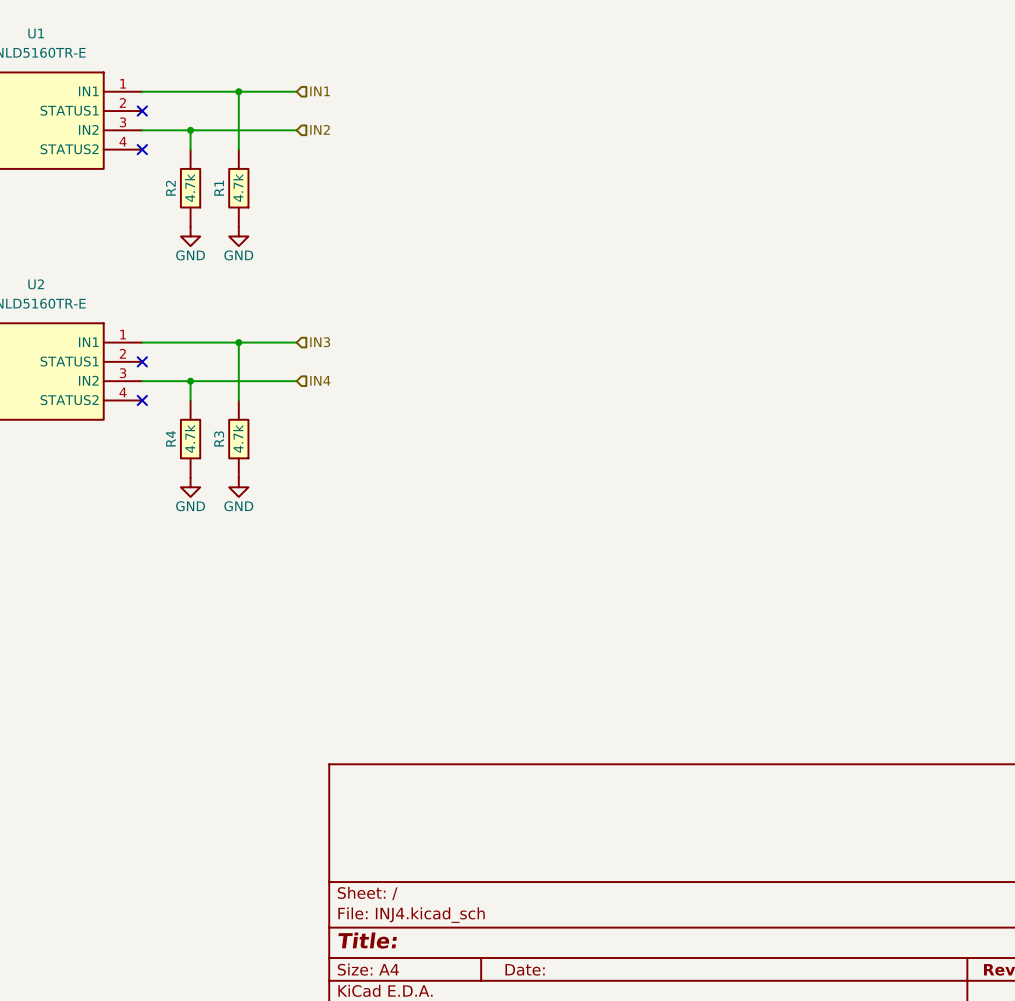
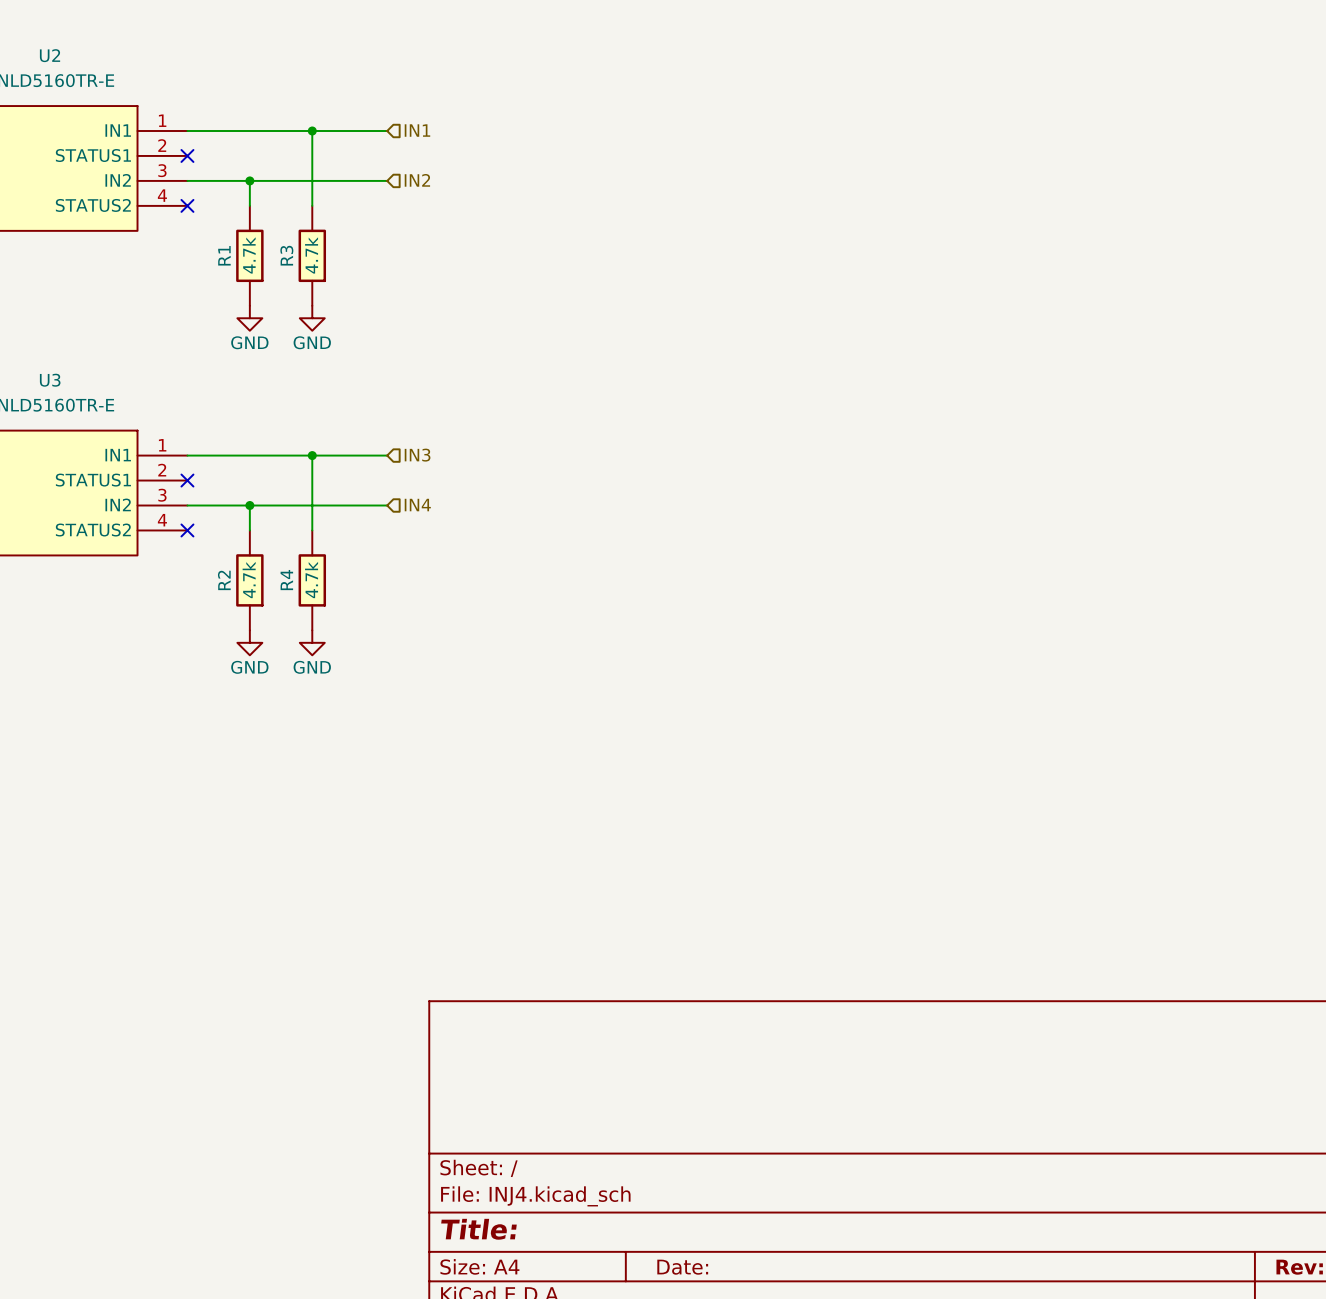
U1 name: U1 (36, 33) -> U2 (50, 55)
R2 name: R2 (170, 188) -> R1 (224, 255)
R1 name: R1 (219, 188) -> R3 (286, 255)
U2 name: U2 (36, 284) -> U3 (50, 380)
R4 name: R4 (170, 438) -> R2 (224, 580)
R3 name: R3 (219, 438) -> R4 (286, 580)

